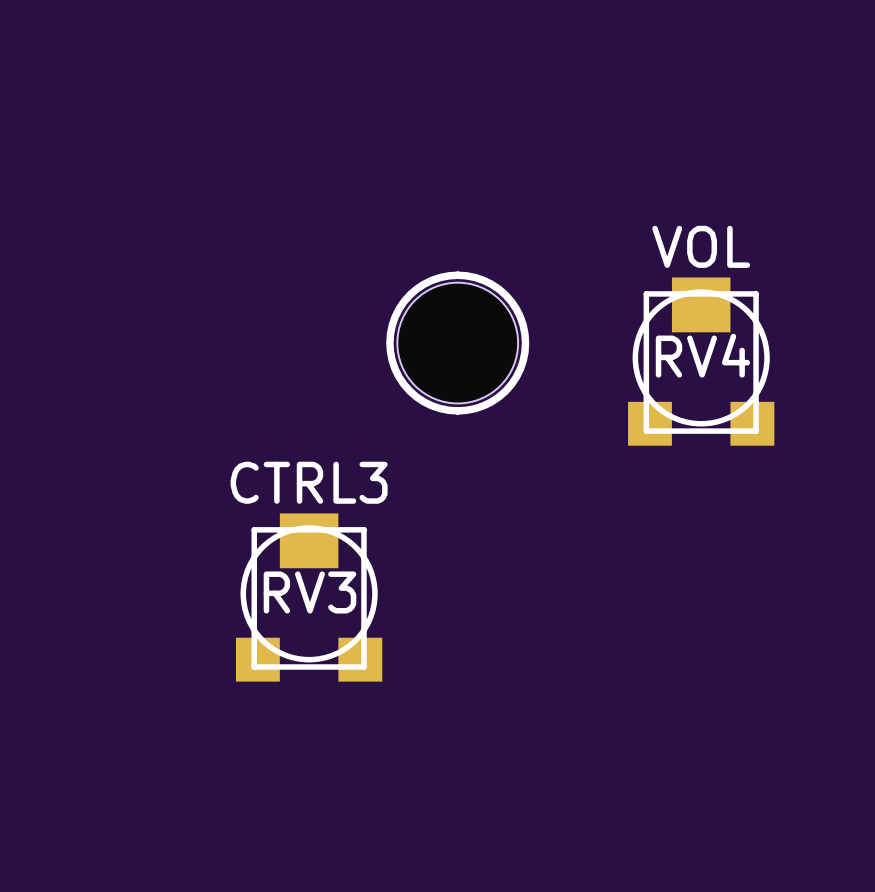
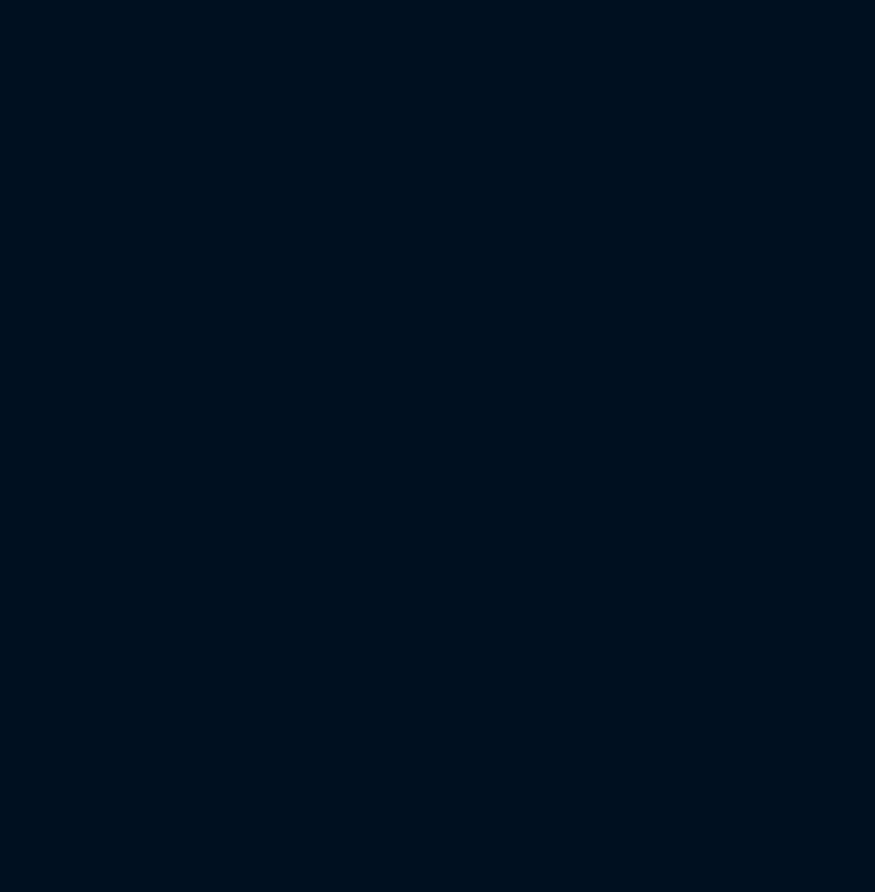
part: (457, 343) -> none
RV4: VOL (701, 361) -> none
RV3: CTRL3 (309, 597) -> none

